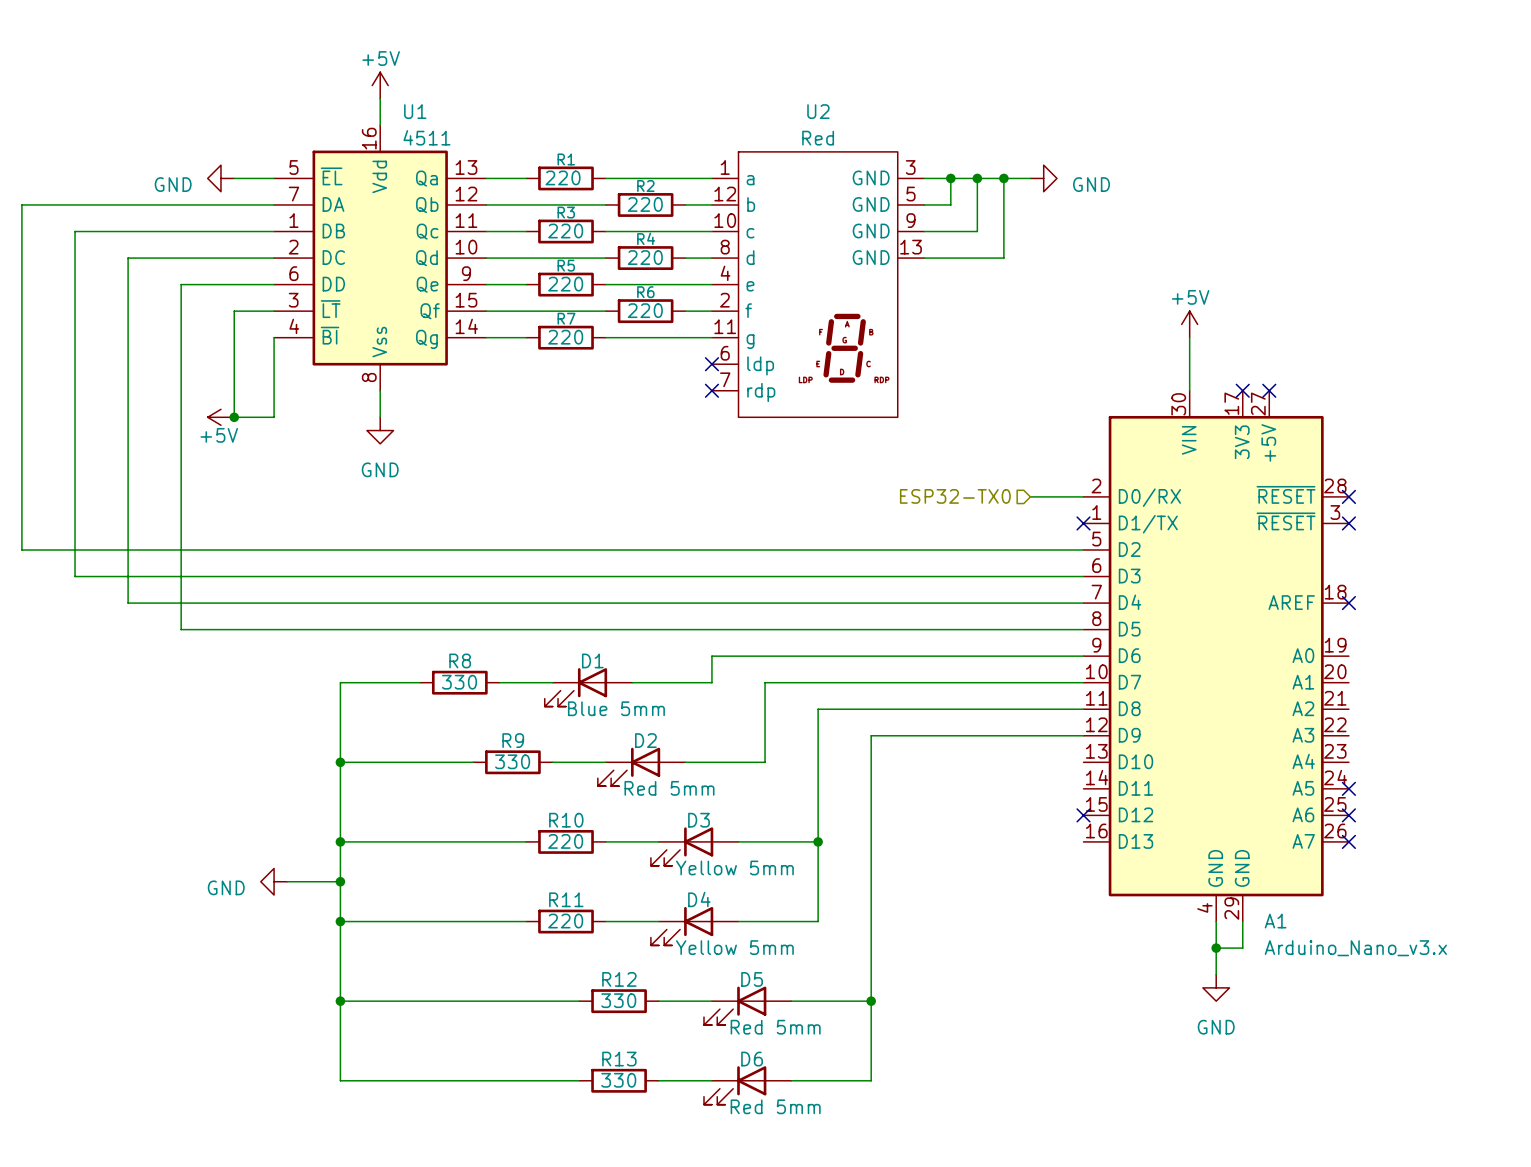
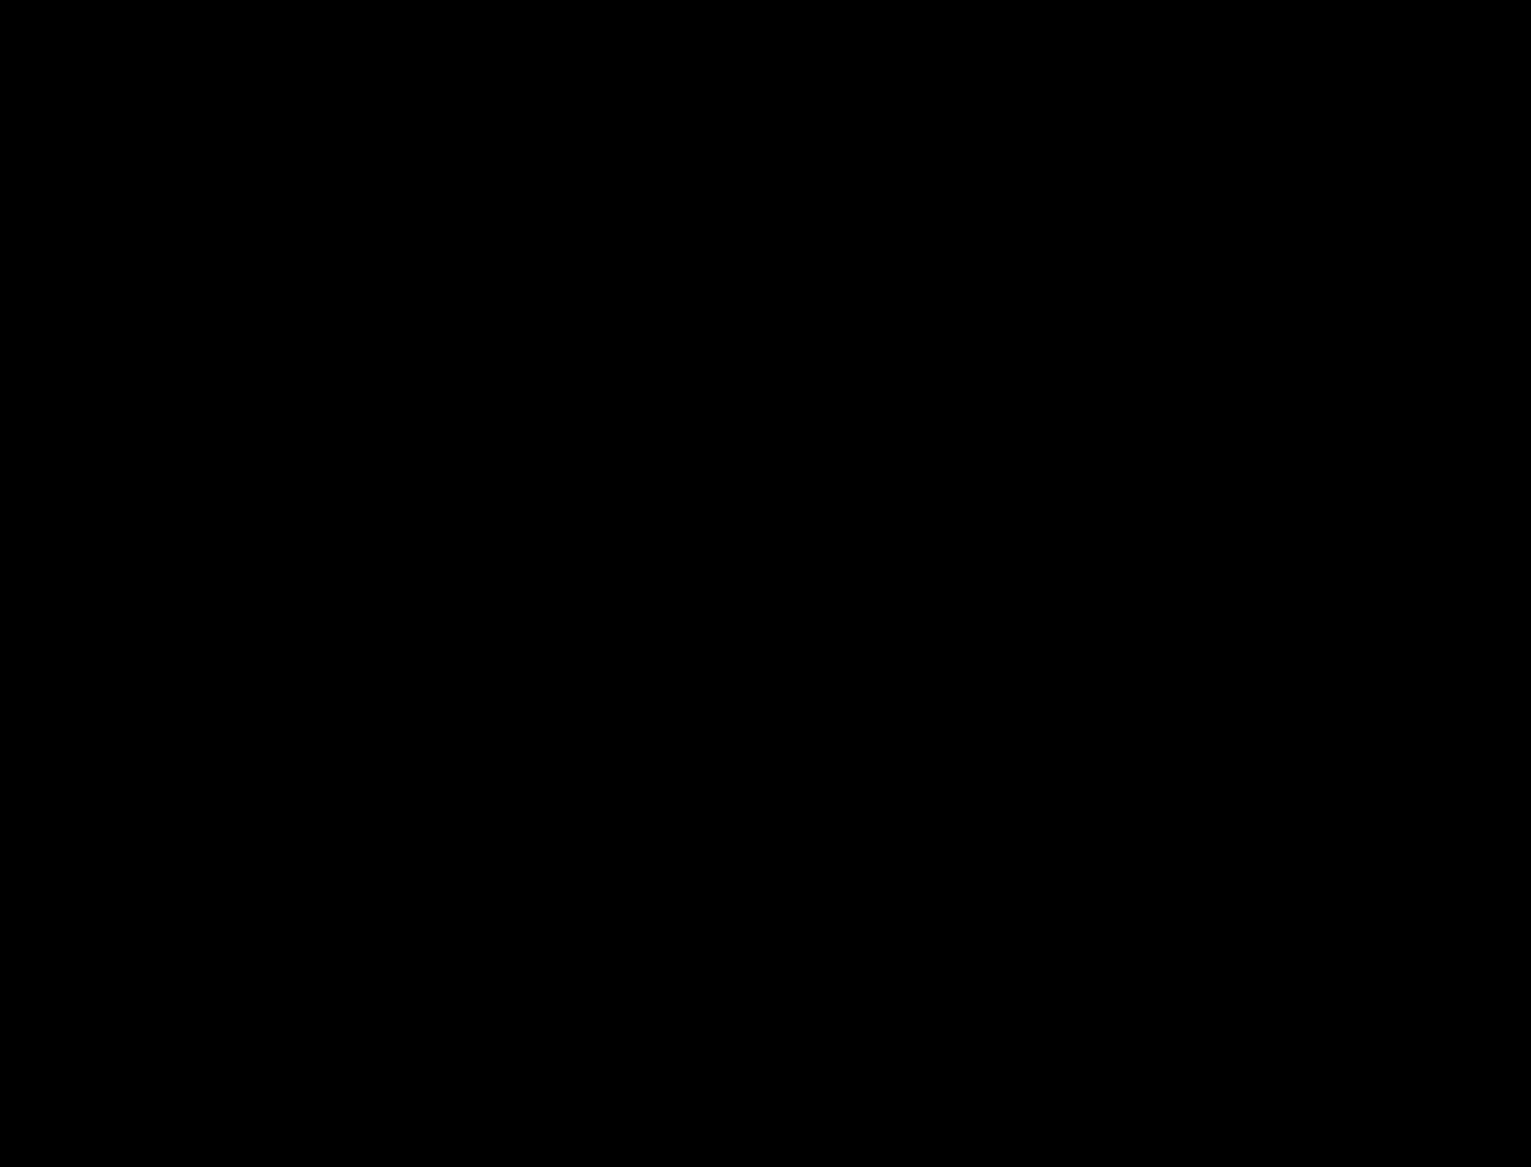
power symbol: +5V (380, 85) -> none
wire: (380, 98) (380, 125) -> none
power symbol: GND (220, 178) -> none
wire: (234, 178) (274, 178) -> none
wire: (486, 178) (526, 178) -> none
R1: 220 (565, 178) -> none
wire: (605, 178) (711, 178) -> none
wire: (924, 178) (1030, 178) -> none
wire: (950, 178) (950, 204) (924, 204) -> none
junction: (950, 178) -> none
wire: (977, 178) (977, 231) (924, 231) -> none
junction: (977, 178) -> none
wire: (1003, 178) (1003, 258) (924, 258) -> none
junction: (1003, 178) -> none
power symbol: GND (1043, 178) -> none
wire: (274, 204) (21, 204) (21, 549) (1083, 549) -> none
wire: (486, 204) (605, 204) -> none
R2: 220 (645, 204) -> none
wire: (685, 204) (711, 204) -> none
wire: (274, 231) (75, 231) (75, 576) (1083, 576) -> none
wire: (486, 231) (526, 231) -> none
R3: 220 (565, 231) -> none
wire: (605, 231) (711, 231) -> none
wire: (274, 258) (128, 258) (128, 603) (1083, 603) -> none
U1: 4511 (380, 258) -> none
wire: (486, 258) (605, 258) -> none
R4: 220 (645, 258) -> none
wire: (685, 258) (711, 258) -> none
wire: (274, 284) (181, 284) (181, 629) (1083, 629) -> none
wire: (486, 284) (526, 284) -> none
R5: 220 (565, 284) -> none
wire: (605, 284) (711, 284) -> none
U2: Red (818, 284) -> none
wire: (274, 311) (234, 311) (234, 417) (274, 417) (274, 337) -> none
wire: (486, 311) (605, 311) -> none
R6: 220 (645, 311) -> none
wire: (685, 311) (711, 311) -> none
power symbol: +5V (1189, 324) -> none
wire: (486, 337) (526, 337) -> none
R7: 220 (565, 337) -> none
wire: (605, 337) (711, 337) -> none
wire: (1189, 337) (1189, 390) -> none
no-connect mark: (711, 364) -> none
wire: (380, 390) (380, 417) -> none
no-connect mark: (711, 390) -> none
no-connect mark: (1242, 390) -> none
no-connect mark: (1269, 390) -> none
power symbol: +5V (220, 417) -> none
junction: (234, 417) -> none
power symbol: GND (380, 430) -> none
hierarchical label: ESP32-TX0 (955, 496) -> none
wire: (1030, 496) (1083, 496) -> none
no-connect mark: (1348, 496) -> none
no-connect mark: (1083, 523) -> none
no-connect mark: (1348, 523) -> none
no-connect mark: (1348, 603) -> none
wire: (1083, 656) (711, 656) (711, 682) (632, 682) -> none
A1: Arduino_Nano_v3.x (1216, 656) -> none
wire: (420, 682) (340, 682) (340, 1080) (579, 1080) -> none
R8: 330 (459, 682) -> none
wire: (499, 682) (552, 682) -> none
wire: (1083, 682) (765, 682) (765, 762) (685, 762) -> none
D1: Blue 5mm (588, 687) -> none
wire: (1083, 709) (818, 709) (818, 921) (738, 921) -> none
wire: (1083, 735) (871, 735) (871, 1080) (791, 1080) -> none
wire: (340, 762) (473, 762) -> none
junction: (340, 762) -> none
R9: 330 (512, 762) -> none
wire: (552, 762) (605, 762) -> none
D2: Red 5mm (641, 766) -> none
no-connect mark: (1348, 788) -> none
no-connect mark: (1083, 815) -> none
no-connect mark: (1348, 815) -> none
wire: (340, 841) (526, 841) -> none
junction: (340, 841) -> none
R10: 220 (565, 841) -> none
wire: (605, 841) (658, 841) -> none
wire: (738, 841) (818, 841) -> none
junction: (818, 841) -> none
no-connect mark: (1348, 841) -> none
D3: Yellow 5mm (694, 846) -> none
power symbol: GND (274, 881) -> none
wire: (287, 881) (340, 881) -> none
junction: (340, 881) -> none
wire: (340, 921) (526, 921) -> none
junction: (340, 921) -> none
R11: 220 (565, 921) -> none
wire: (605, 921) (658, 921) -> none
wire: (1216, 921) (1216, 974) -> none
wire: (1242, 921) (1242, 948) (1216, 948) -> none
D4: Yellow 5mm (694, 926) -> none
junction: (1216, 948) -> none
power symbol: GND (1216, 987) -> none
wire: (340, 1001) (579, 1001) -> none
junction: (340, 1001) -> none
R12: 330 (619, 1001) -> none
wire: (658, 1001) (711, 1001) -> none
wire: (791, 1001) (871, 1001) -> none
junction: (871, 1001) -> none
D5: Red 5mm (747, 1005) -> none
R13: 330 (619, 1080) -> none
wire: (658, 1080) (711, 1080) -> none
D6: Red 5mm (747, 1085) -> none

